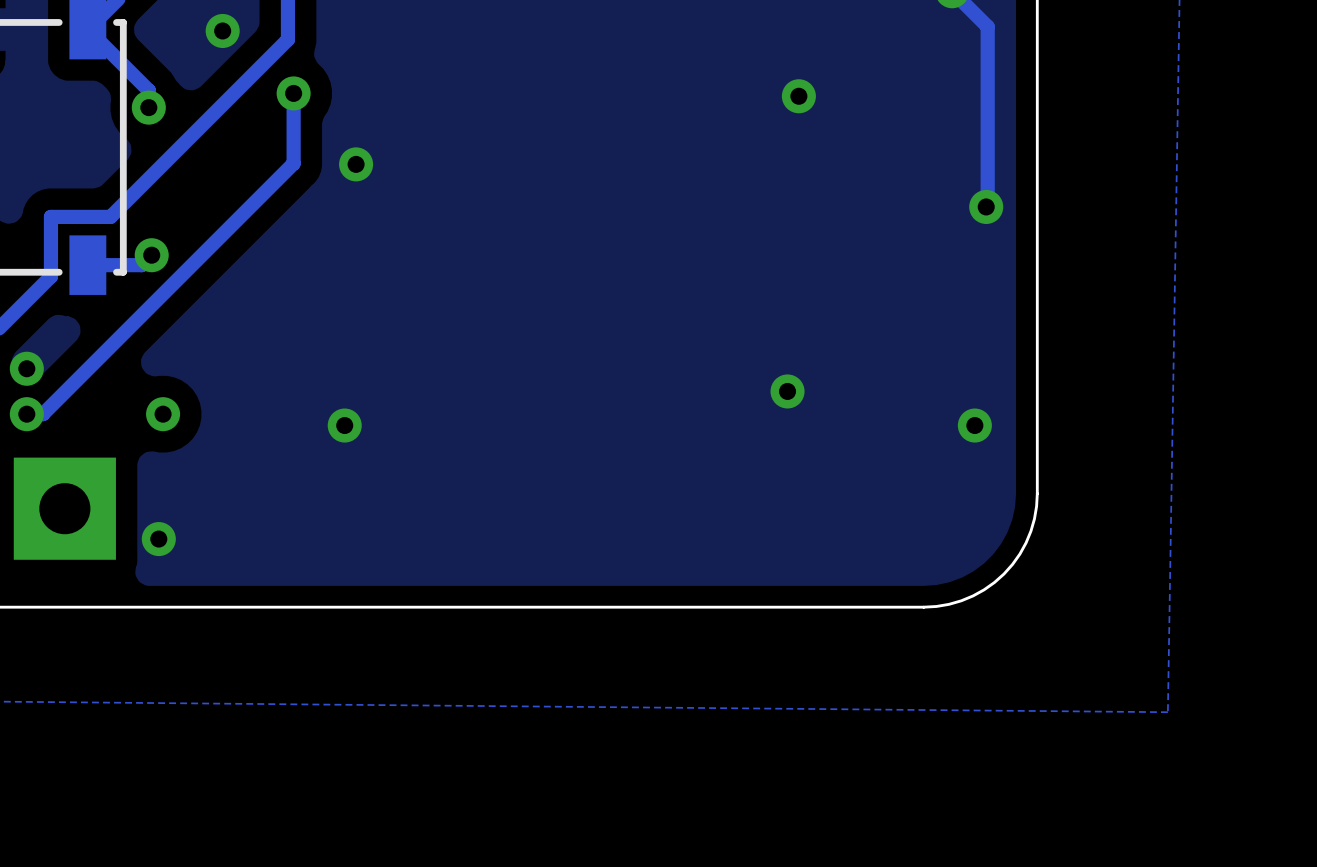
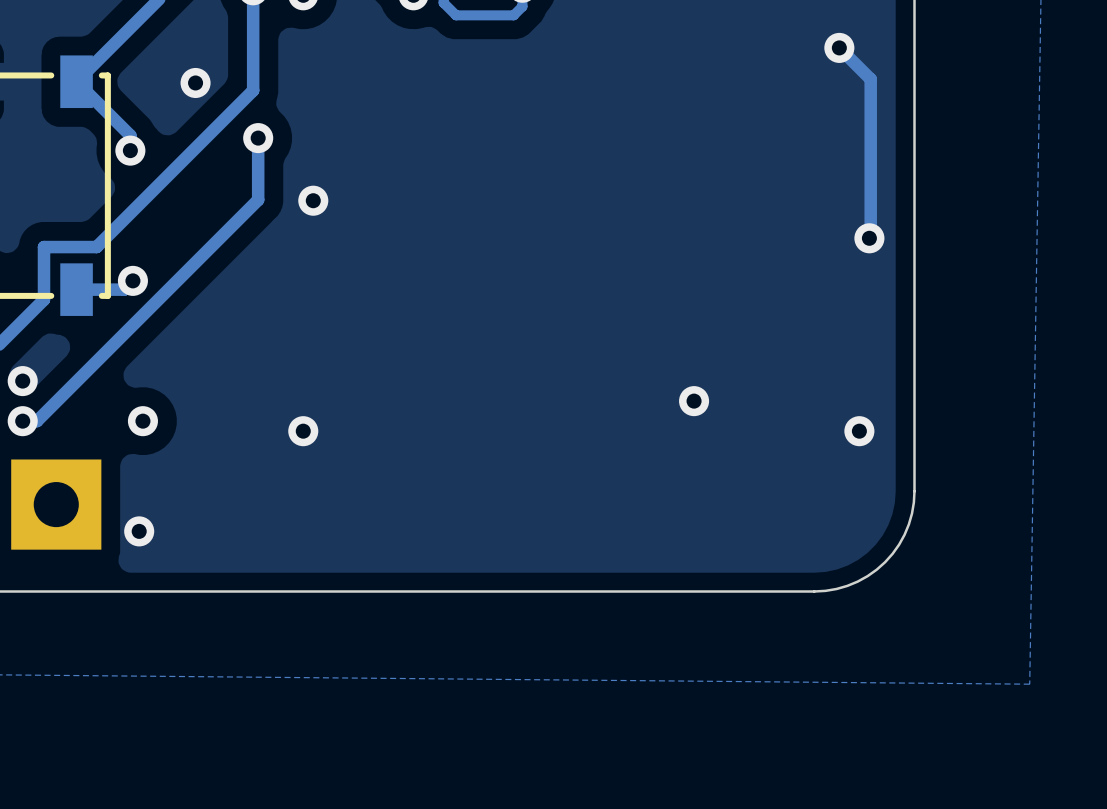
via: (798, 96) -> none

